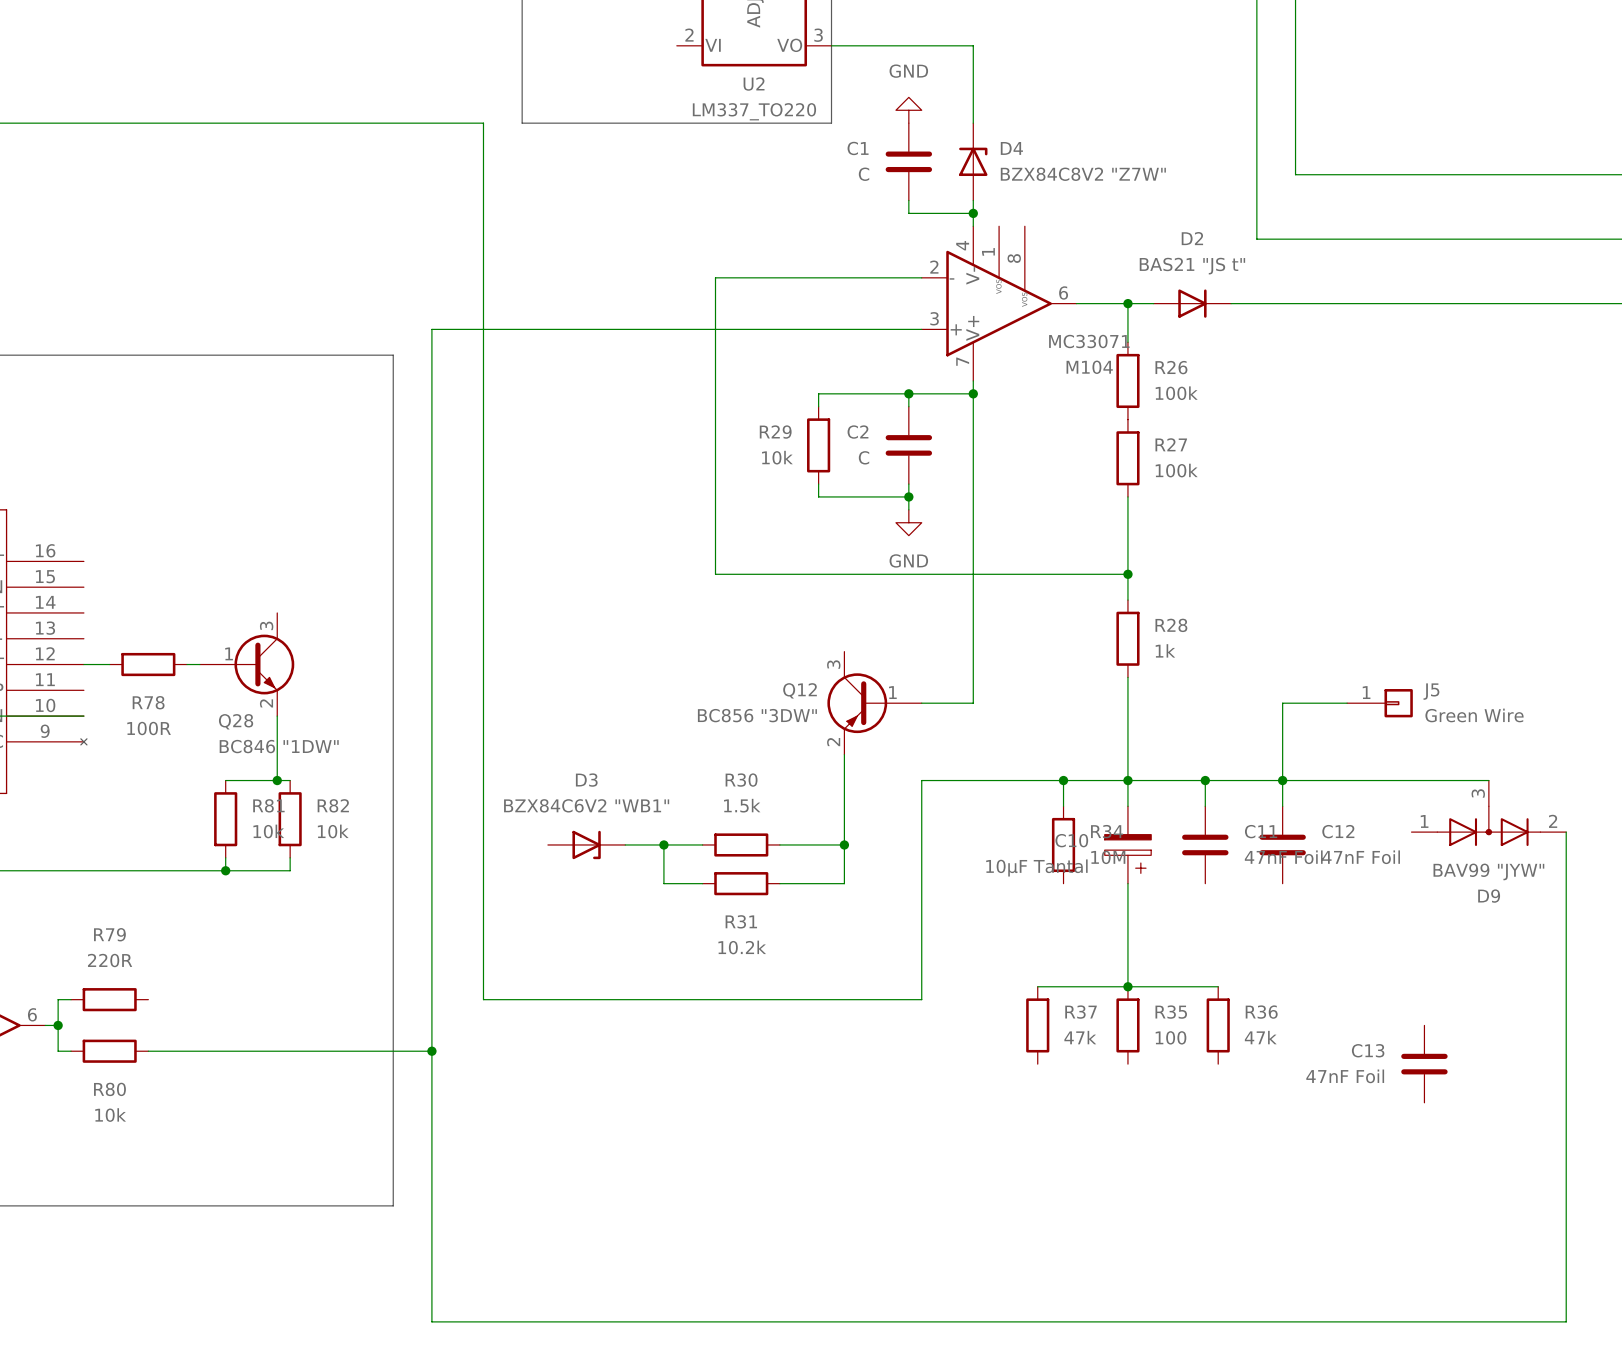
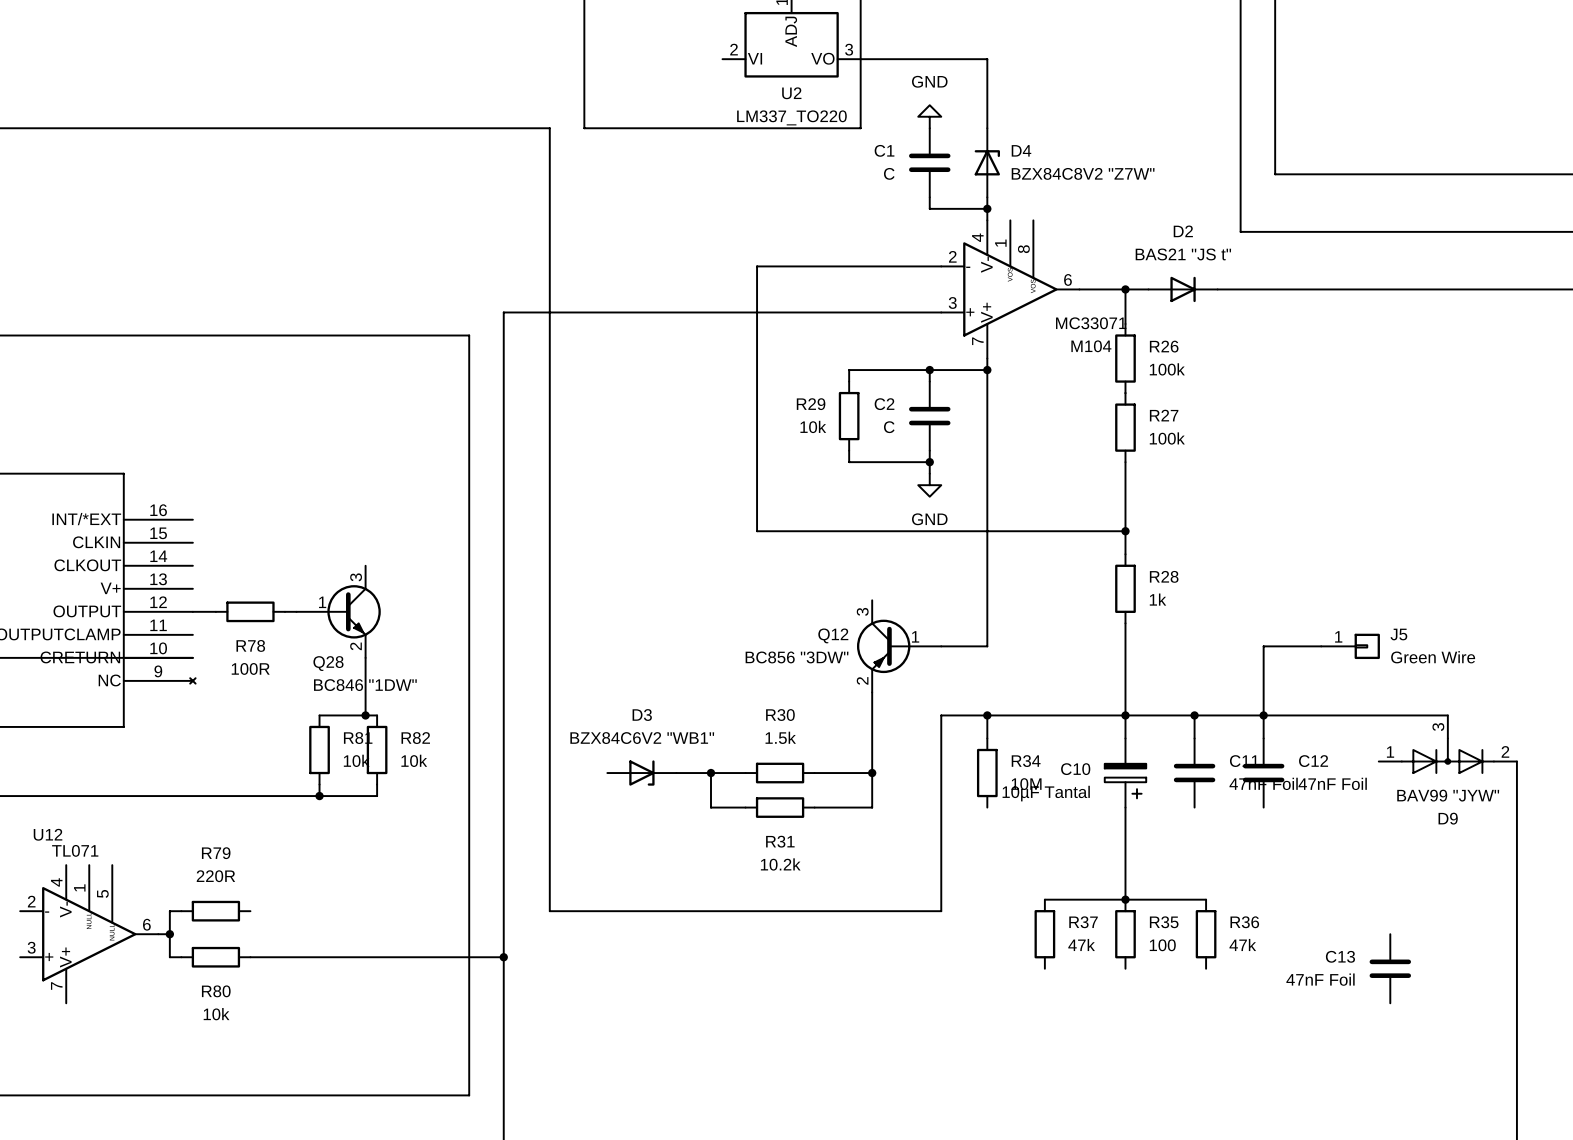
junction: none -> (987, 715)
wire: (1063, 780) (1063, 806) -> (987, 715) (987, 738)
junction: (1063, 780) -> none
R34 position: (1063, 844) -> (987, 773)

